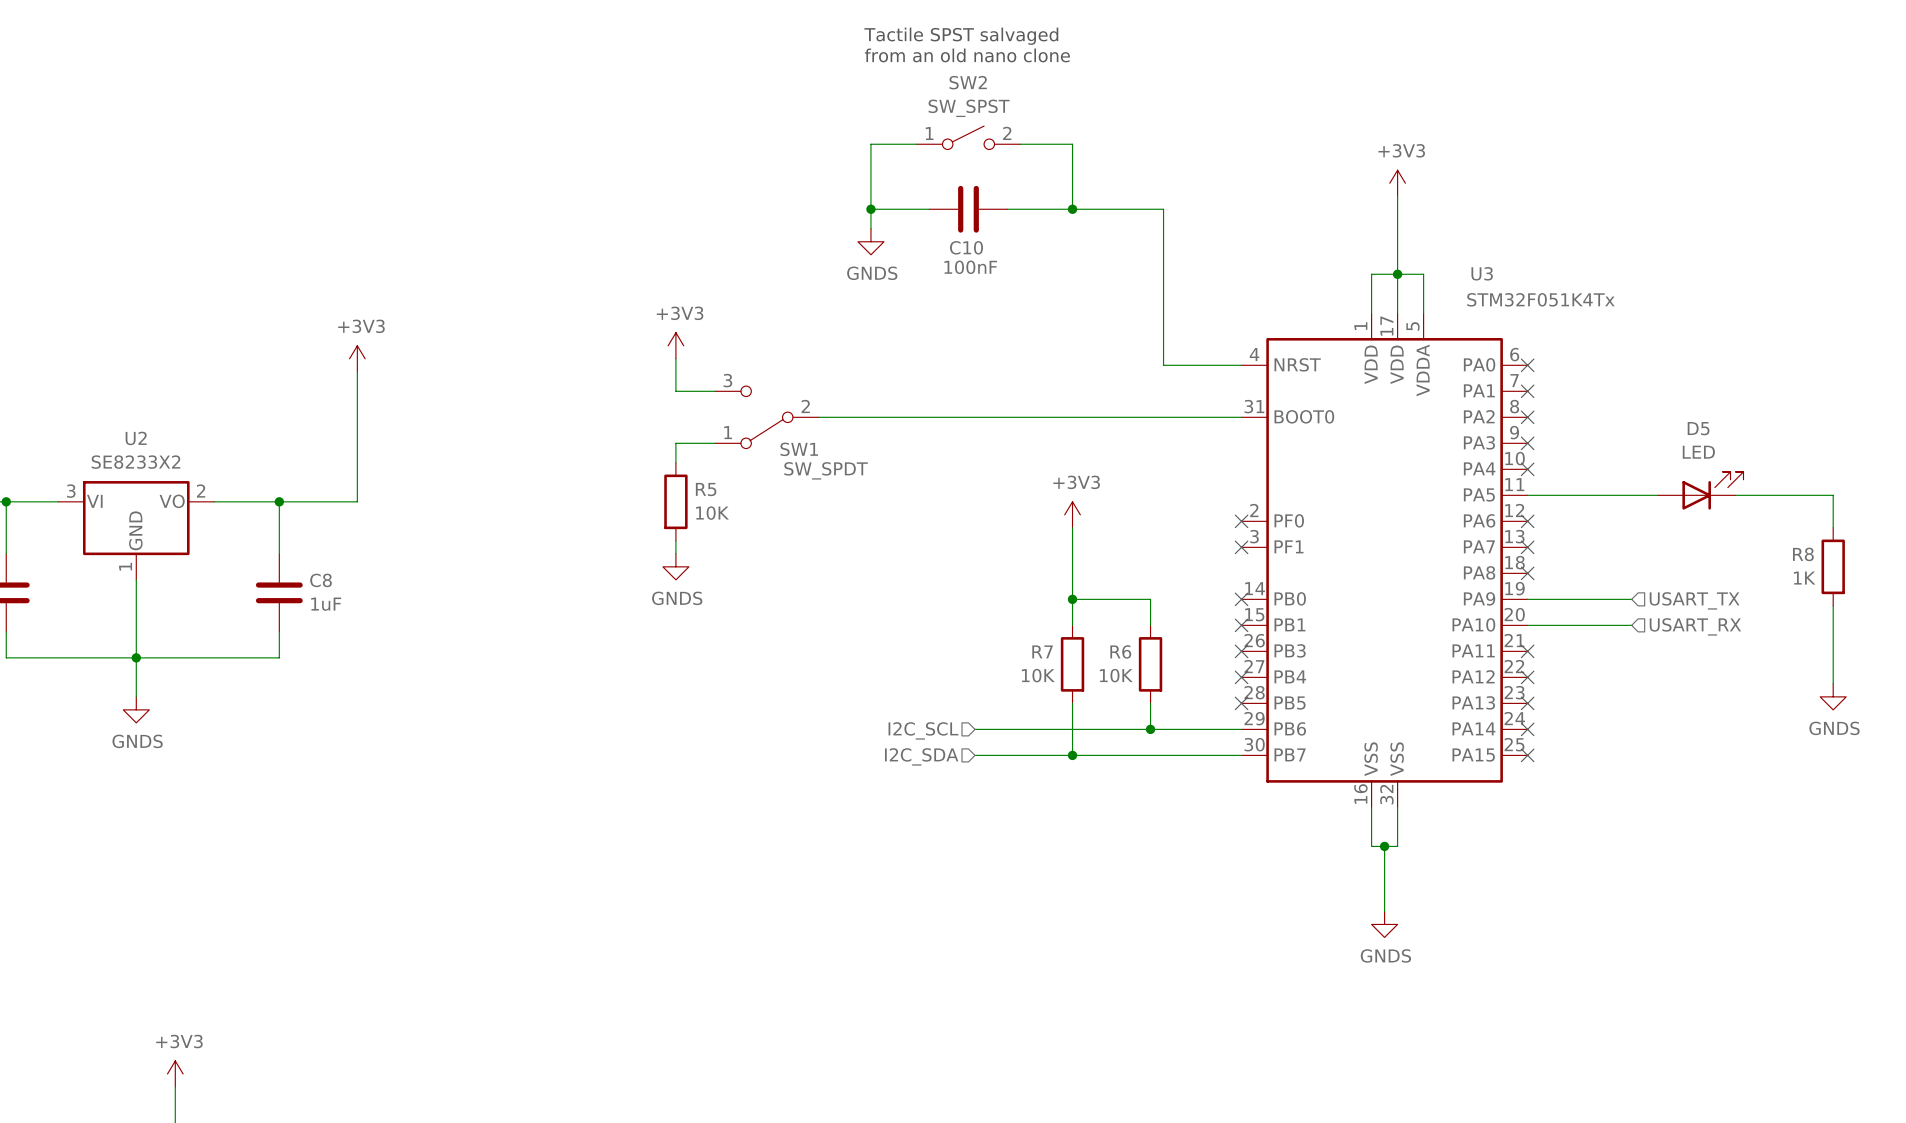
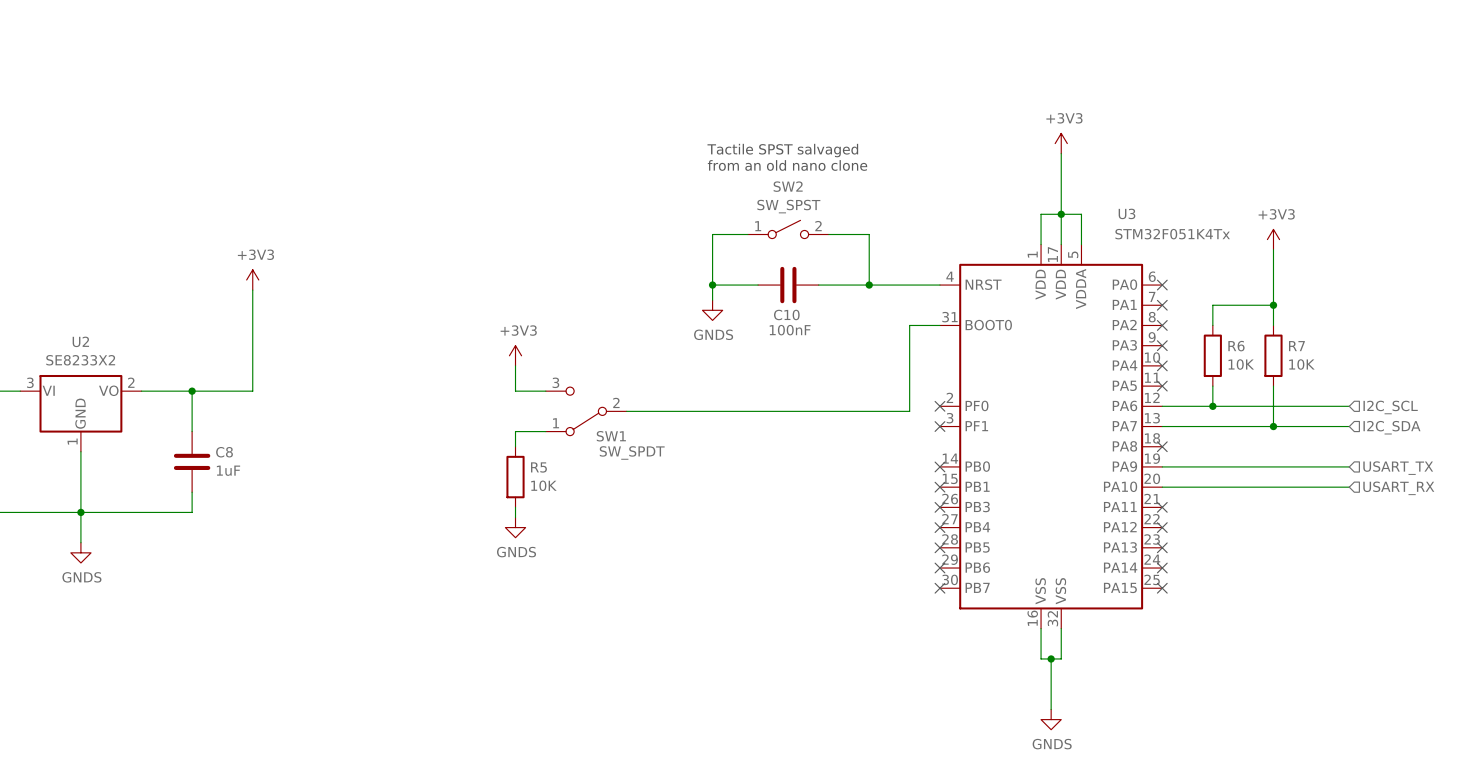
text position: Tactile SPST salvaged (961, 36) -> Tactile SPST salvaged (782, 150)
text position: from an old nano clone (967, 55) -> from an old nano clone (787, 165)
SW2 position: (968, 137) -> (788, 229)
wire: (916, 144) (870, 144) (870, 228) -> (747, 234) (712, 234) (712, 300)
wire: (1020, 144) (1072, 144) (1072, 209) -> (828, 234) (869, 234) (869, 285)
wire: (870, 209) (929, 209) -> (712, 285) (758, 285)
junction: (870, 209) -> none
C10 position: (968, 209) -> (788, 285)
wire: (1007, 209) (1163, 209) (1163, 365) -> (818, 285) (879, 285)
junction: (1072, 209) -> none
power symbol: GNDS (870, 241) -> none
power symbol: none -> +3V3 (1273, 239)
wire: none -> (1273, 249) (1273, 325)
power symbol position: +3V3 (675, 345) -> +3V3 (515, 355)
wire: (675, 358) (675, 391) (714, 391) -> (515, 365) (515, 391) (545, 391)
junction: none -> (712, 285)
junction: none -> (869, 285)
wire: none -> (1273, 305) (1212, 305) (1212, 325)
junction: none -> (1273, 305)
power symbol: none -> GNDS (712, 310)
SW1 position: (766, 417) -> (586, 411)
wire: (818, 417) (1202, 417) -> (626, 411) (909, 411) (909, 325)
wire: (714, 443) (675, 443) (675, 462) -> (545, 431) (515, 431) (515, 446)
D5: LED (1700, 490) -> none
wire: (1527, 495) (1657, 495) -> none
no-connect mark: none -> (1162, 386)
wire: none -> (1212, 386) (1212, 406)
wire: none -> (1273, 386) (1273, 426)
wire: (1735, 495) (1833, 495) (1833, 527) -> none
R5 position: (675, 501) -> (515, 477)
power symbol: +3V3 (1072, 514) -> none
wire: none -> (1162, 406) (1349, 406)
no-connect mark: (1527, 521) -> none
junction: none -> (1212, 406)
hierarchical label: none -> I2C_SCL (1390, 407)
wire: (1072, 527) (1072, 625) -> none
wire: (675, 540) (675, 553) -> (515, 507) (515, 517)
wire: none -> (1162, 426) (1349, 426)
no-connect mark: (1527, 547) -> none
junction: none -> (1273, 426)
hierarchical label: none -> I2C_SDA (1391, 427)
power symbol position: GNDS (675, 566) -> GNDS (515, 527)
R8: 1K (1833, 566) -> none
wire: (1072, 599) (1150, 599) (1150, 625) -> none
junction: (1072, 599) -> none
wire: none -> (1243, 466) (1349, 466)
hierarchical label position: USART_TX (1694, 600) -> USART_TX (1398, 468)
wire: (1833, 605) (1833, 683) -> none
wire: none -> (1243, 487) (1349, 487)
hierarchical label position: USART_RX (1695, 626) -> USART_RX (1398, 488)
R7 name position: R7 (1042, 651) -> R7 (1296, 346)
R6 name position: R6 (1120, 651) -> R6 (1236, 346)
R7 position: (1072, 664) -> (1273, 355)
R6 position: (1150, 664) -> (1212, 355)
R7 value position: 10K (1038, 675) -> 10K (1301, 364)
R6 value position: 10K (1116, 675) -> 10K (1241, 364)
power symbol: GNDS (1833, 696) -> none
wire: (1072, 703) (1072, 755) -> none
wire: (1150, 703) (1150, 729) -> none
wire: (975, 729) (1241, 729) -> none
junction: (1150, 729) -> none
no-connect mark: none -> (939, 568)
hierarchical label: I2C_SCL (923, 730) -> none
wire: (975, 755) (1241, 755) -> none
junction: (1072, 755) -> none
no-connect mark: none -> (939, 588)
hierarchical label: I2C_SDA (921, 756) -> none

